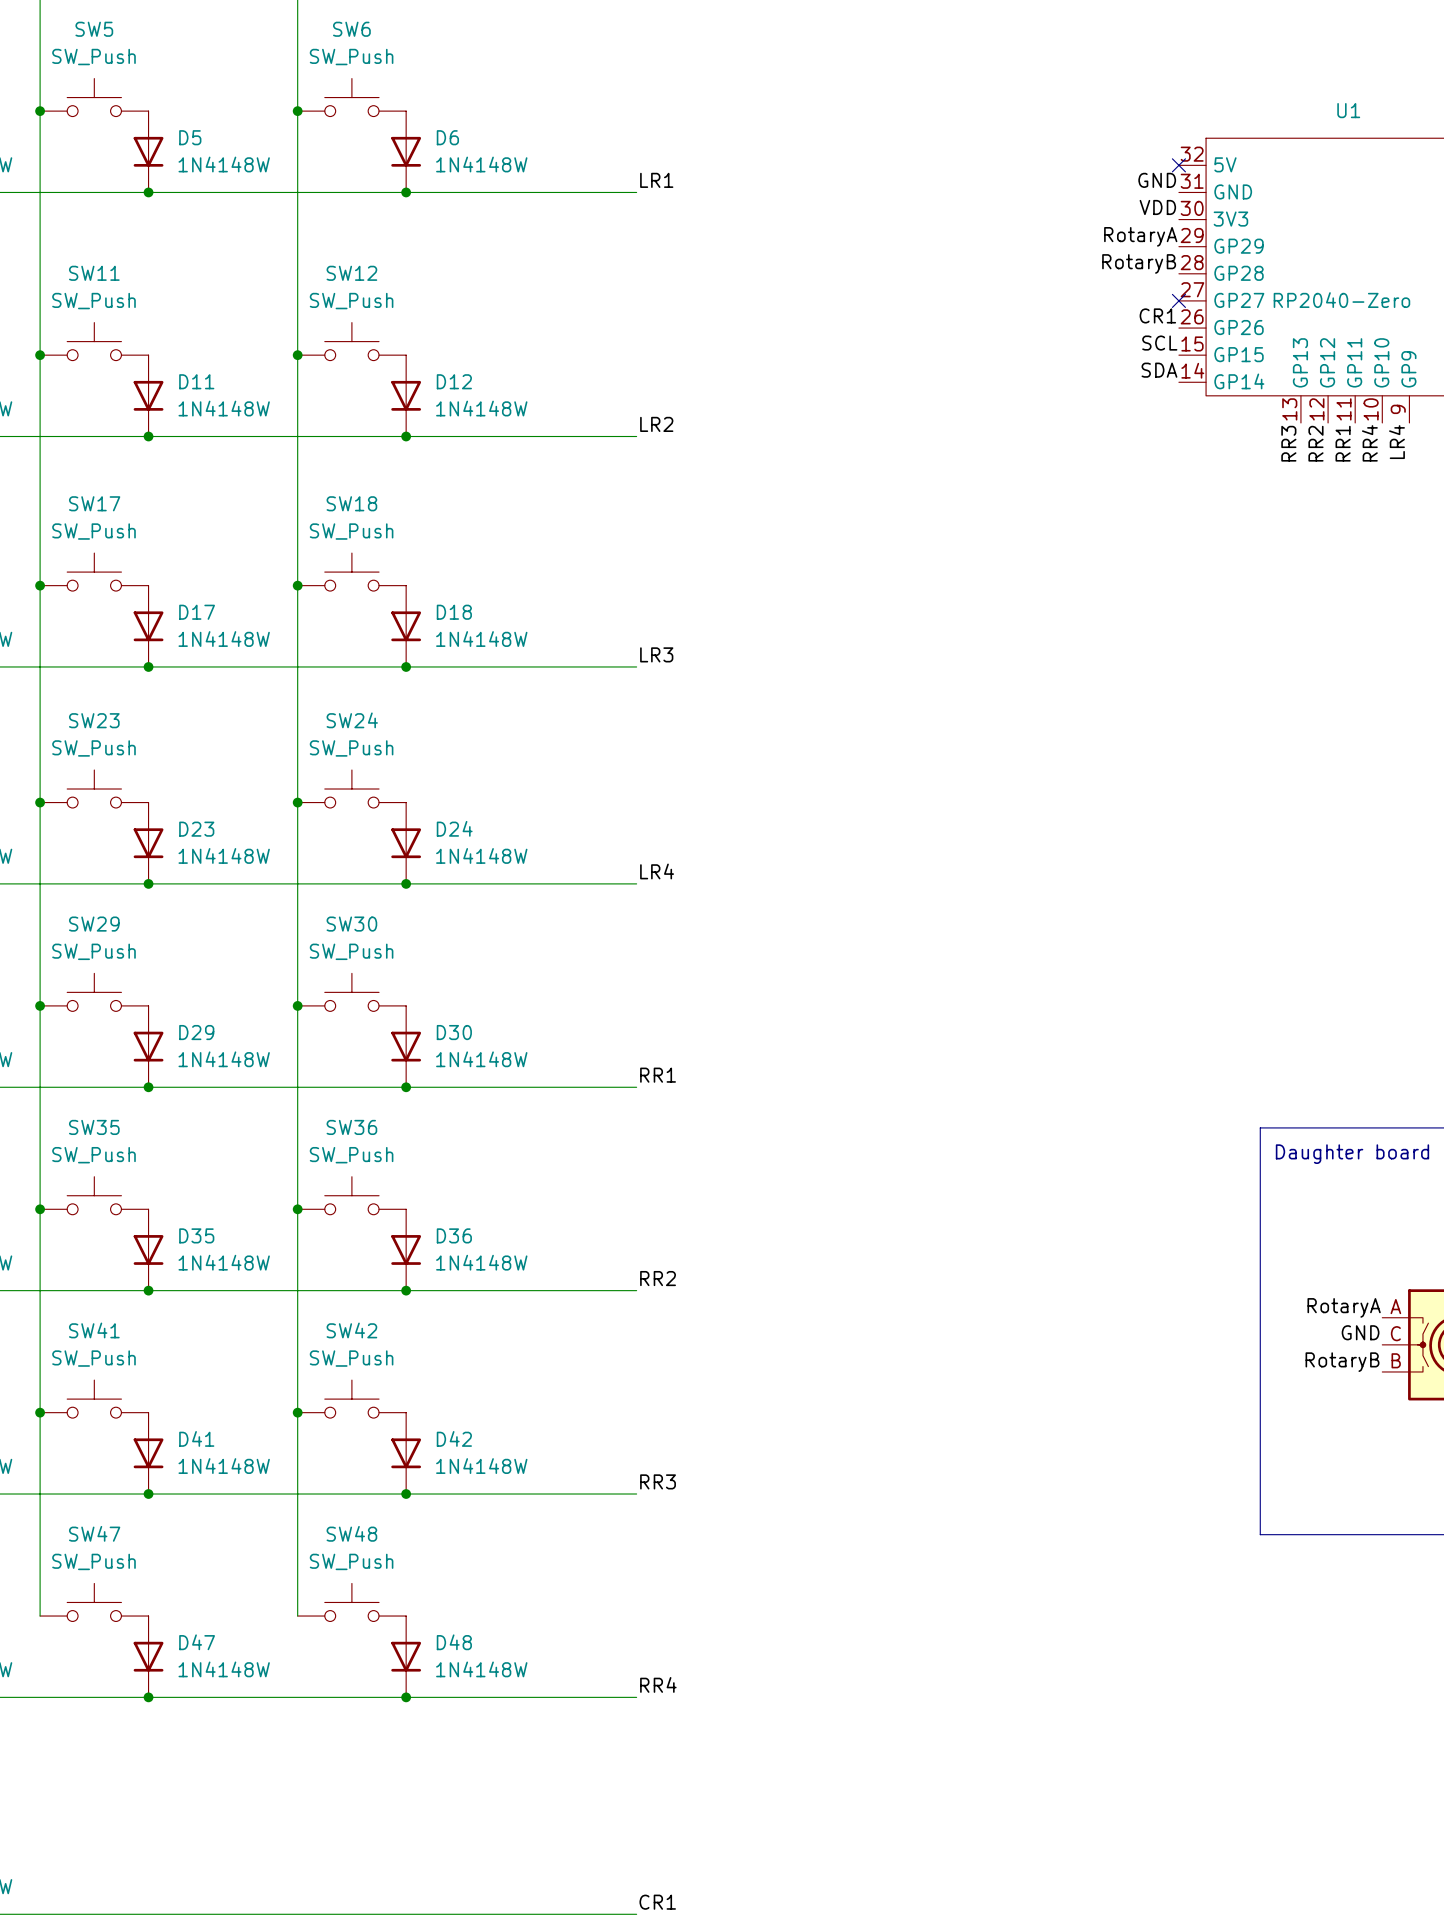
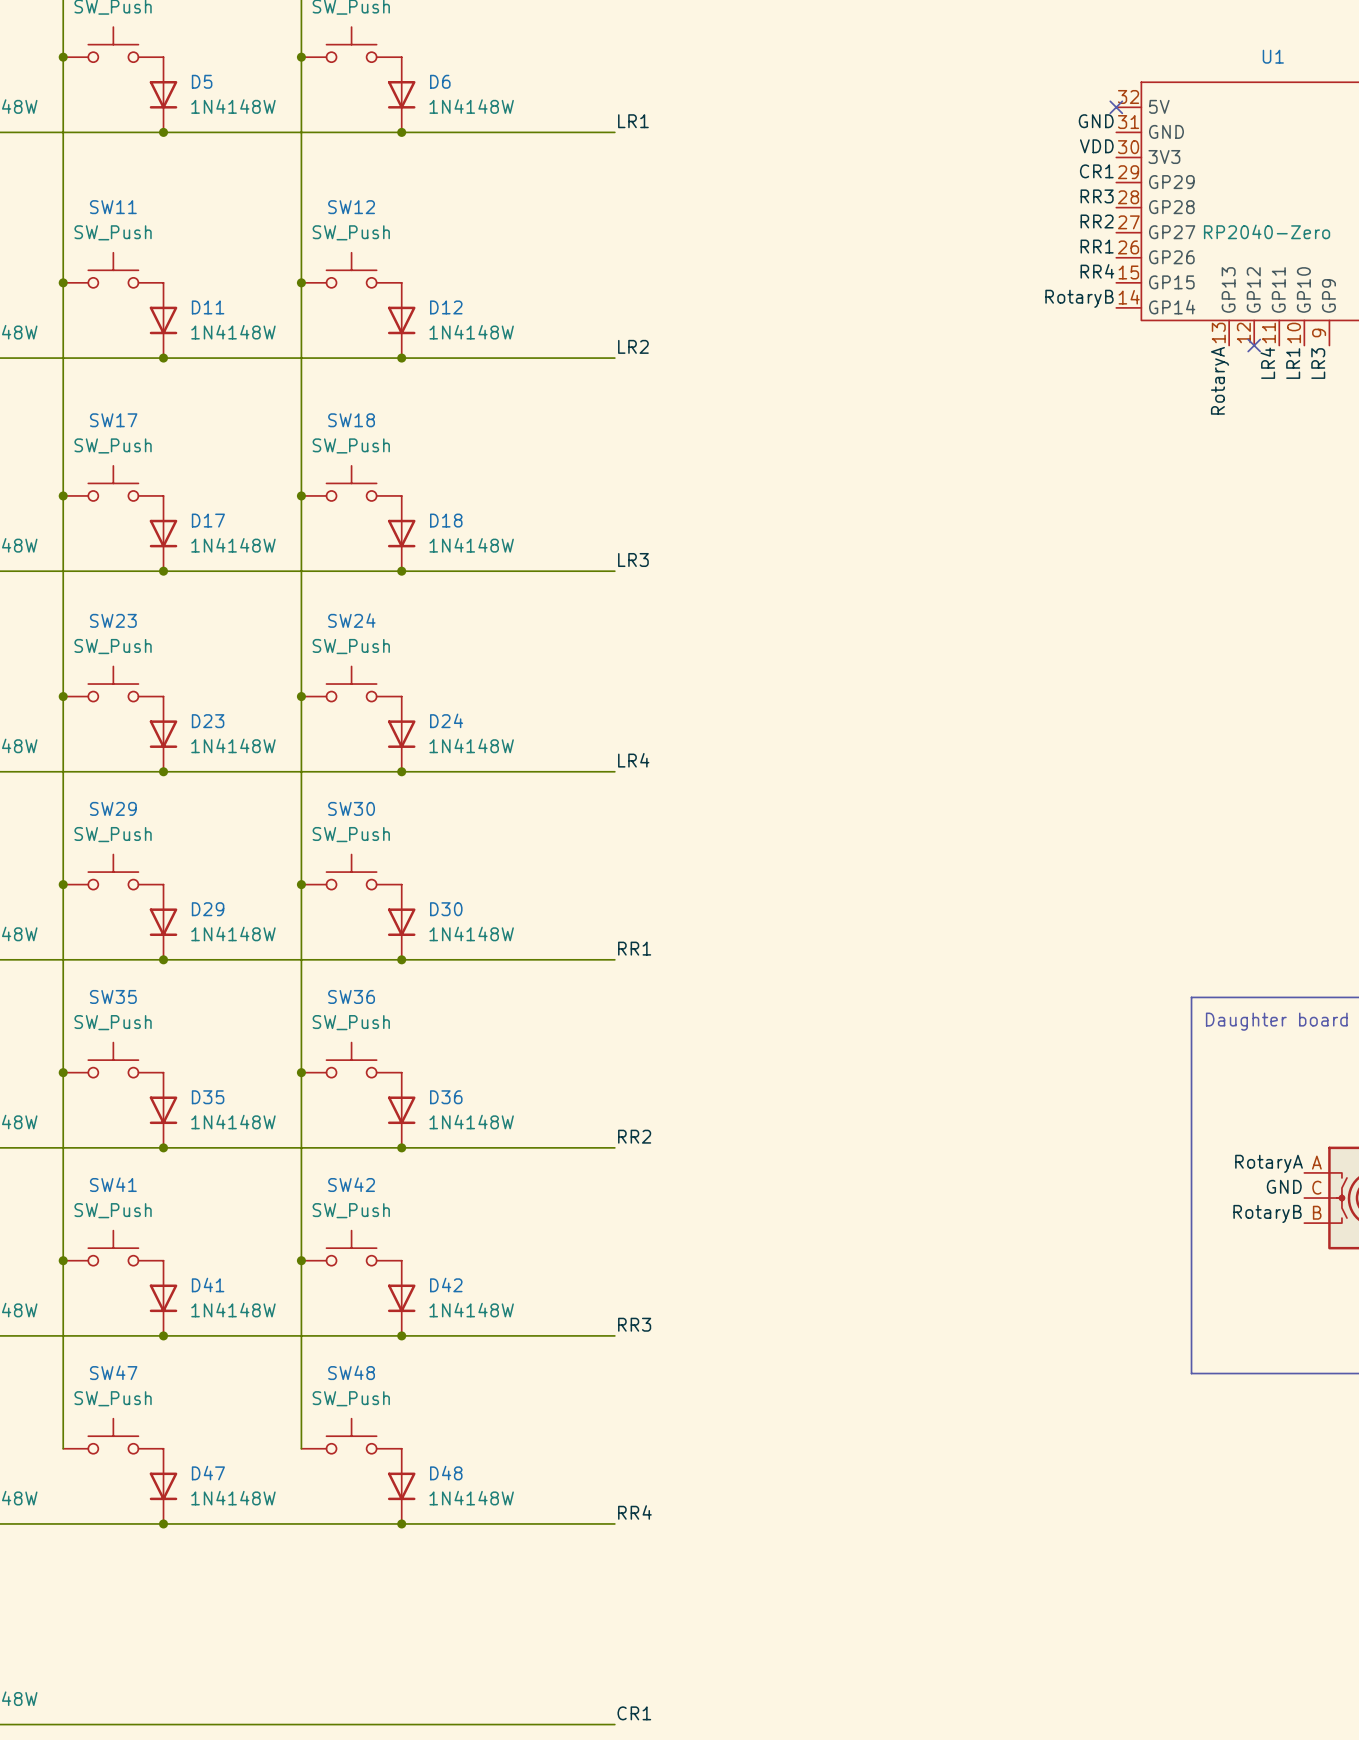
label: RotaryA (1140, 236) -> CR1 (1096, 171)
label: RotaryB (1139, 263) -> RR3 (1097, 196)
no-connect mark: (1178, 300) -> none
label: CR1 (1157, 315) -> RR1 (1097, 246)
label: SCL (1159, 343) -> RR4 (1097, 271)
label: SDA (1159, 370) -> RotaryB (1079, 298)
no-connect mark: none -> (1254, 345)
label: LR4 (1396, 442) -> LR3 (1318, 363)
label: RR3 (1288, 443) -> RotaryA (1220, 380)
label rotation: 0° (1315, 443) -> 90° clockwise (1097, 221)
label position: RR2 (1315, 443) -> RR2 (1097, 221)
label: RR1 (1343, 443) -> LR4 (1267, 363)
label: RR4 (1369, 443) -> LR1 (1293, 363)

